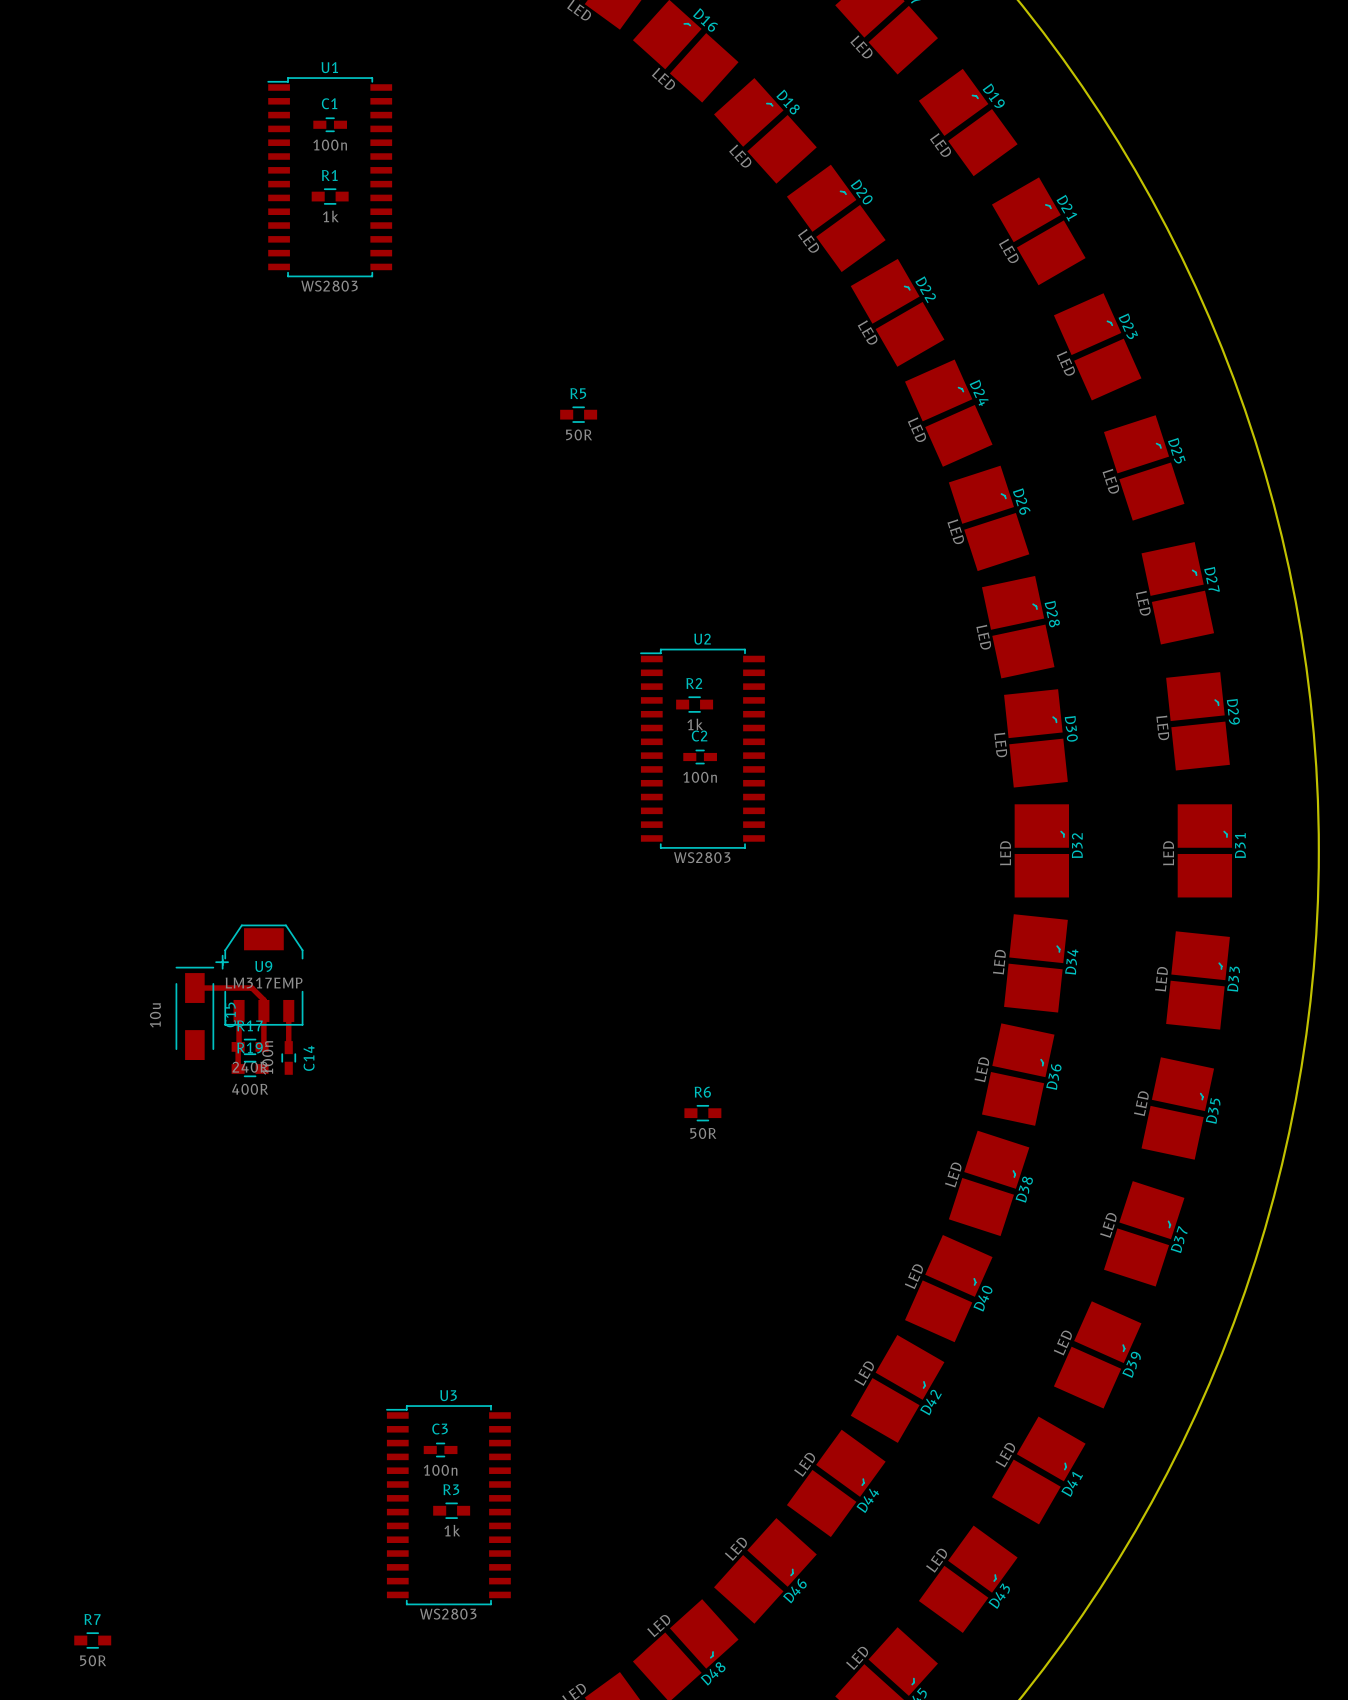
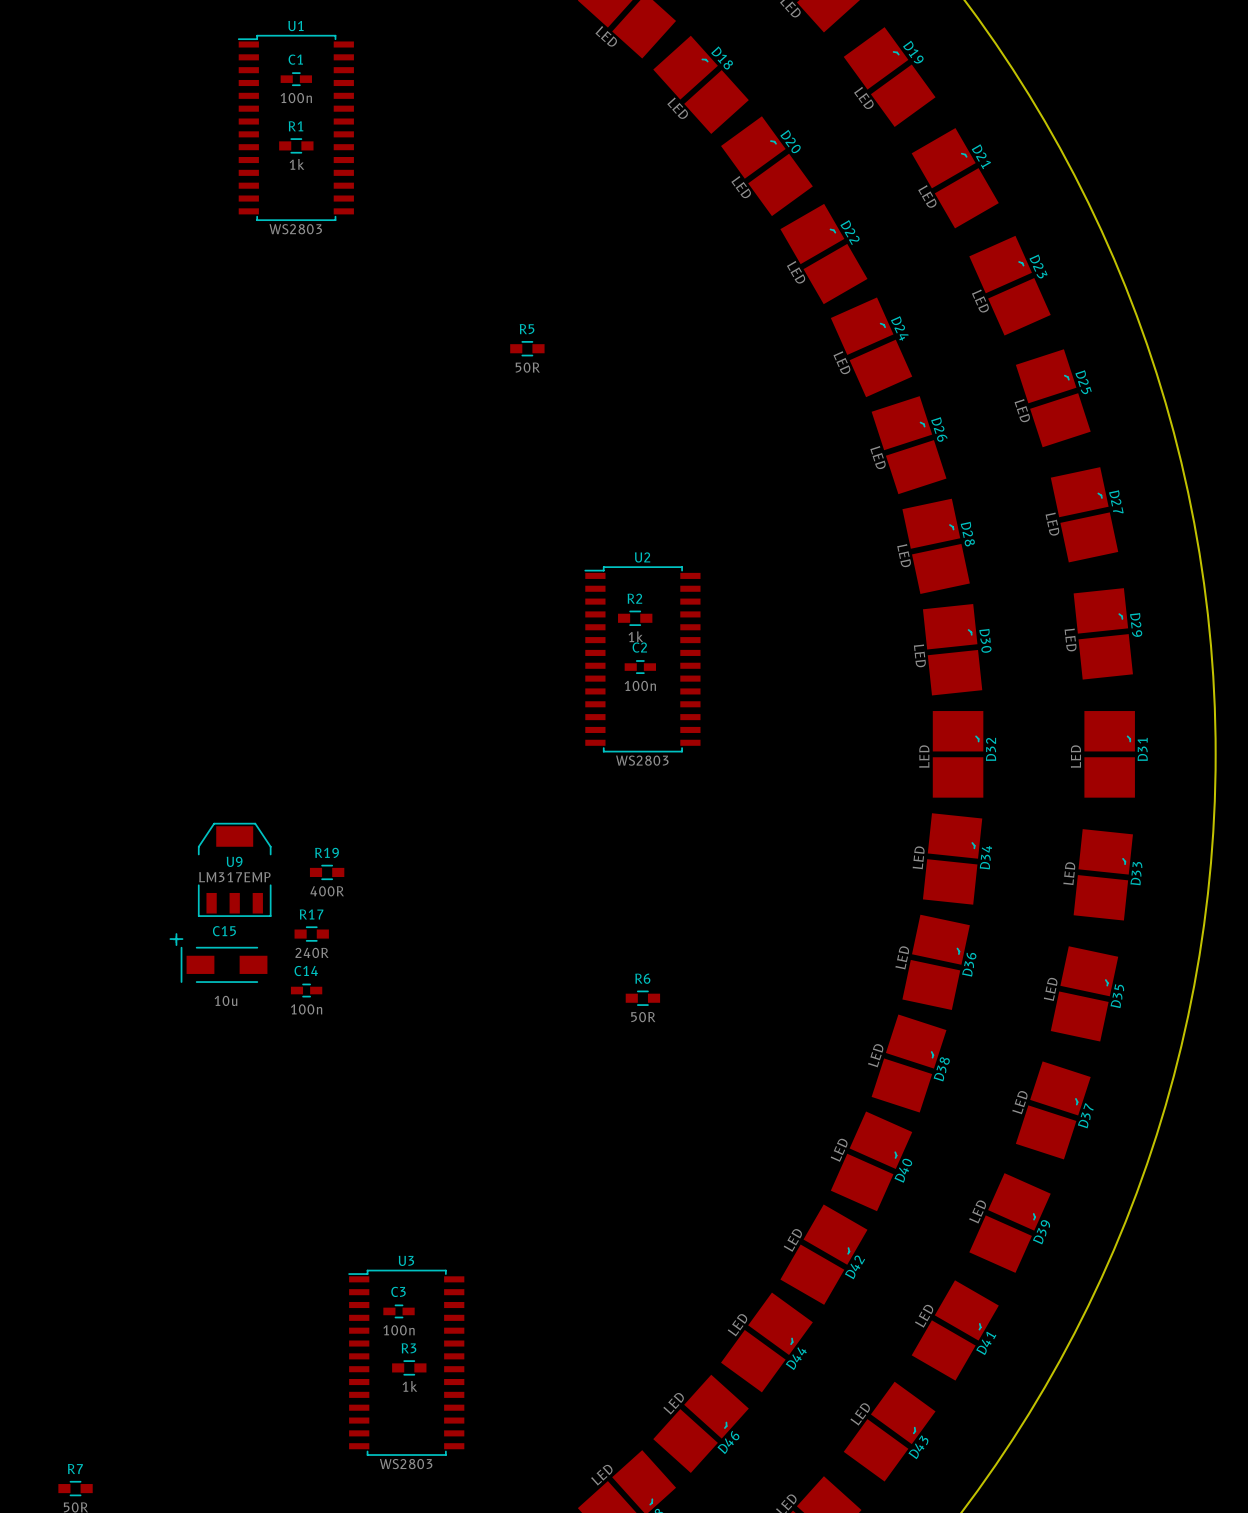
top track: (194, 988) (251, 988) (263, 999) (263, 1045) (262, 1046) -> none
C15 rotation: 0° (202, 1007) -> 90° counterclockwise (218, 958)
C15 position: (202, 1007) -> (218, 958)
top track: (239, 1011) (238, 1068) -> none
top track: (288, 1011) (288, 1047) -> none
R17 position: (250, 1046) -> (311, 934)
C14 value position: 100n (267, 1057) -> 100n (306, 1009)
C14 rotation: 0° (288, 1057) -> 90° clockwise (306, 990)
C14 position: (288, 1057) -> (306, 990)
C14 name position: C14 (309, 1058) -> C14 (306, 971)
R19 position: (250, 1068) -> (327, 872)

